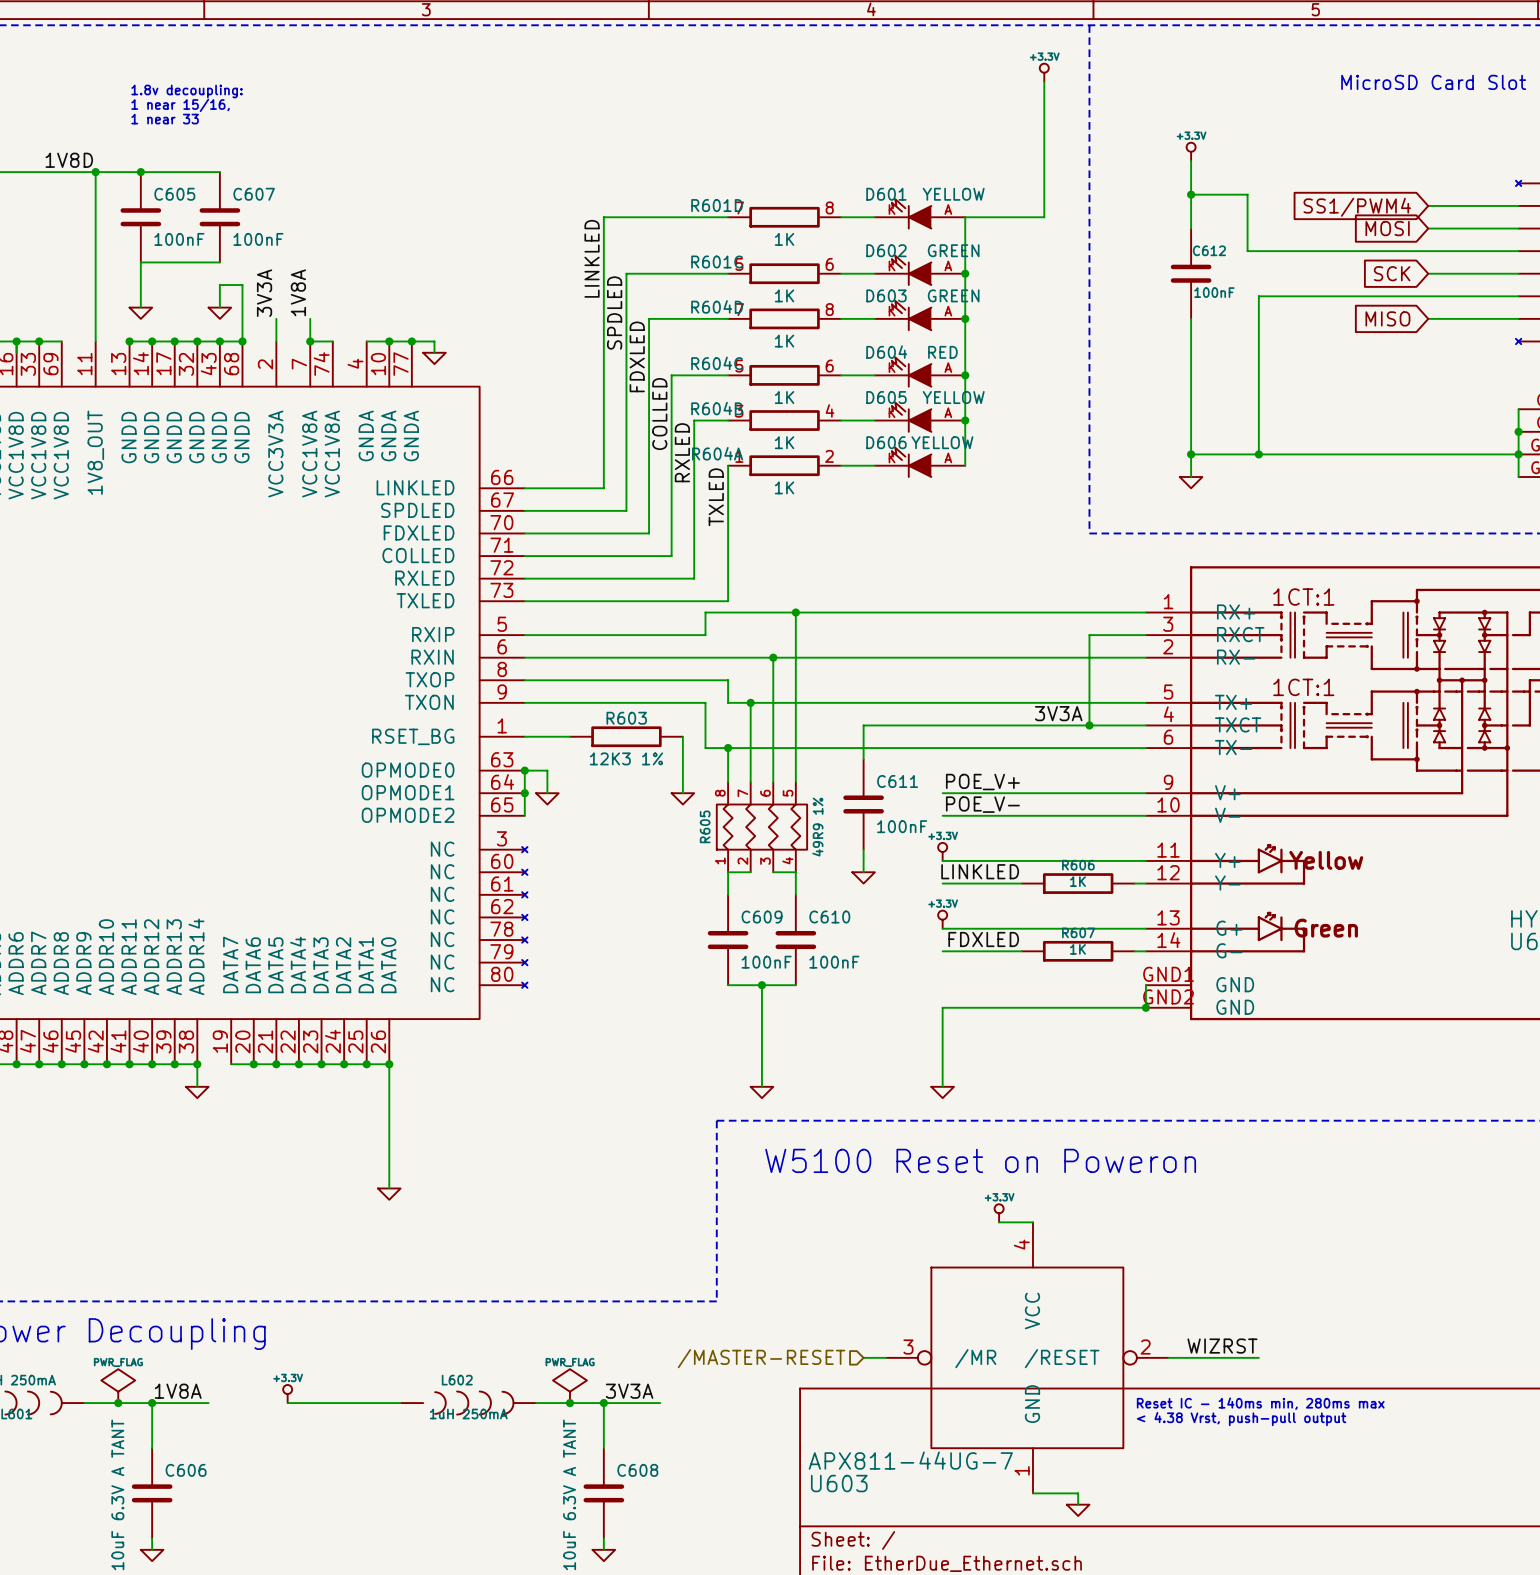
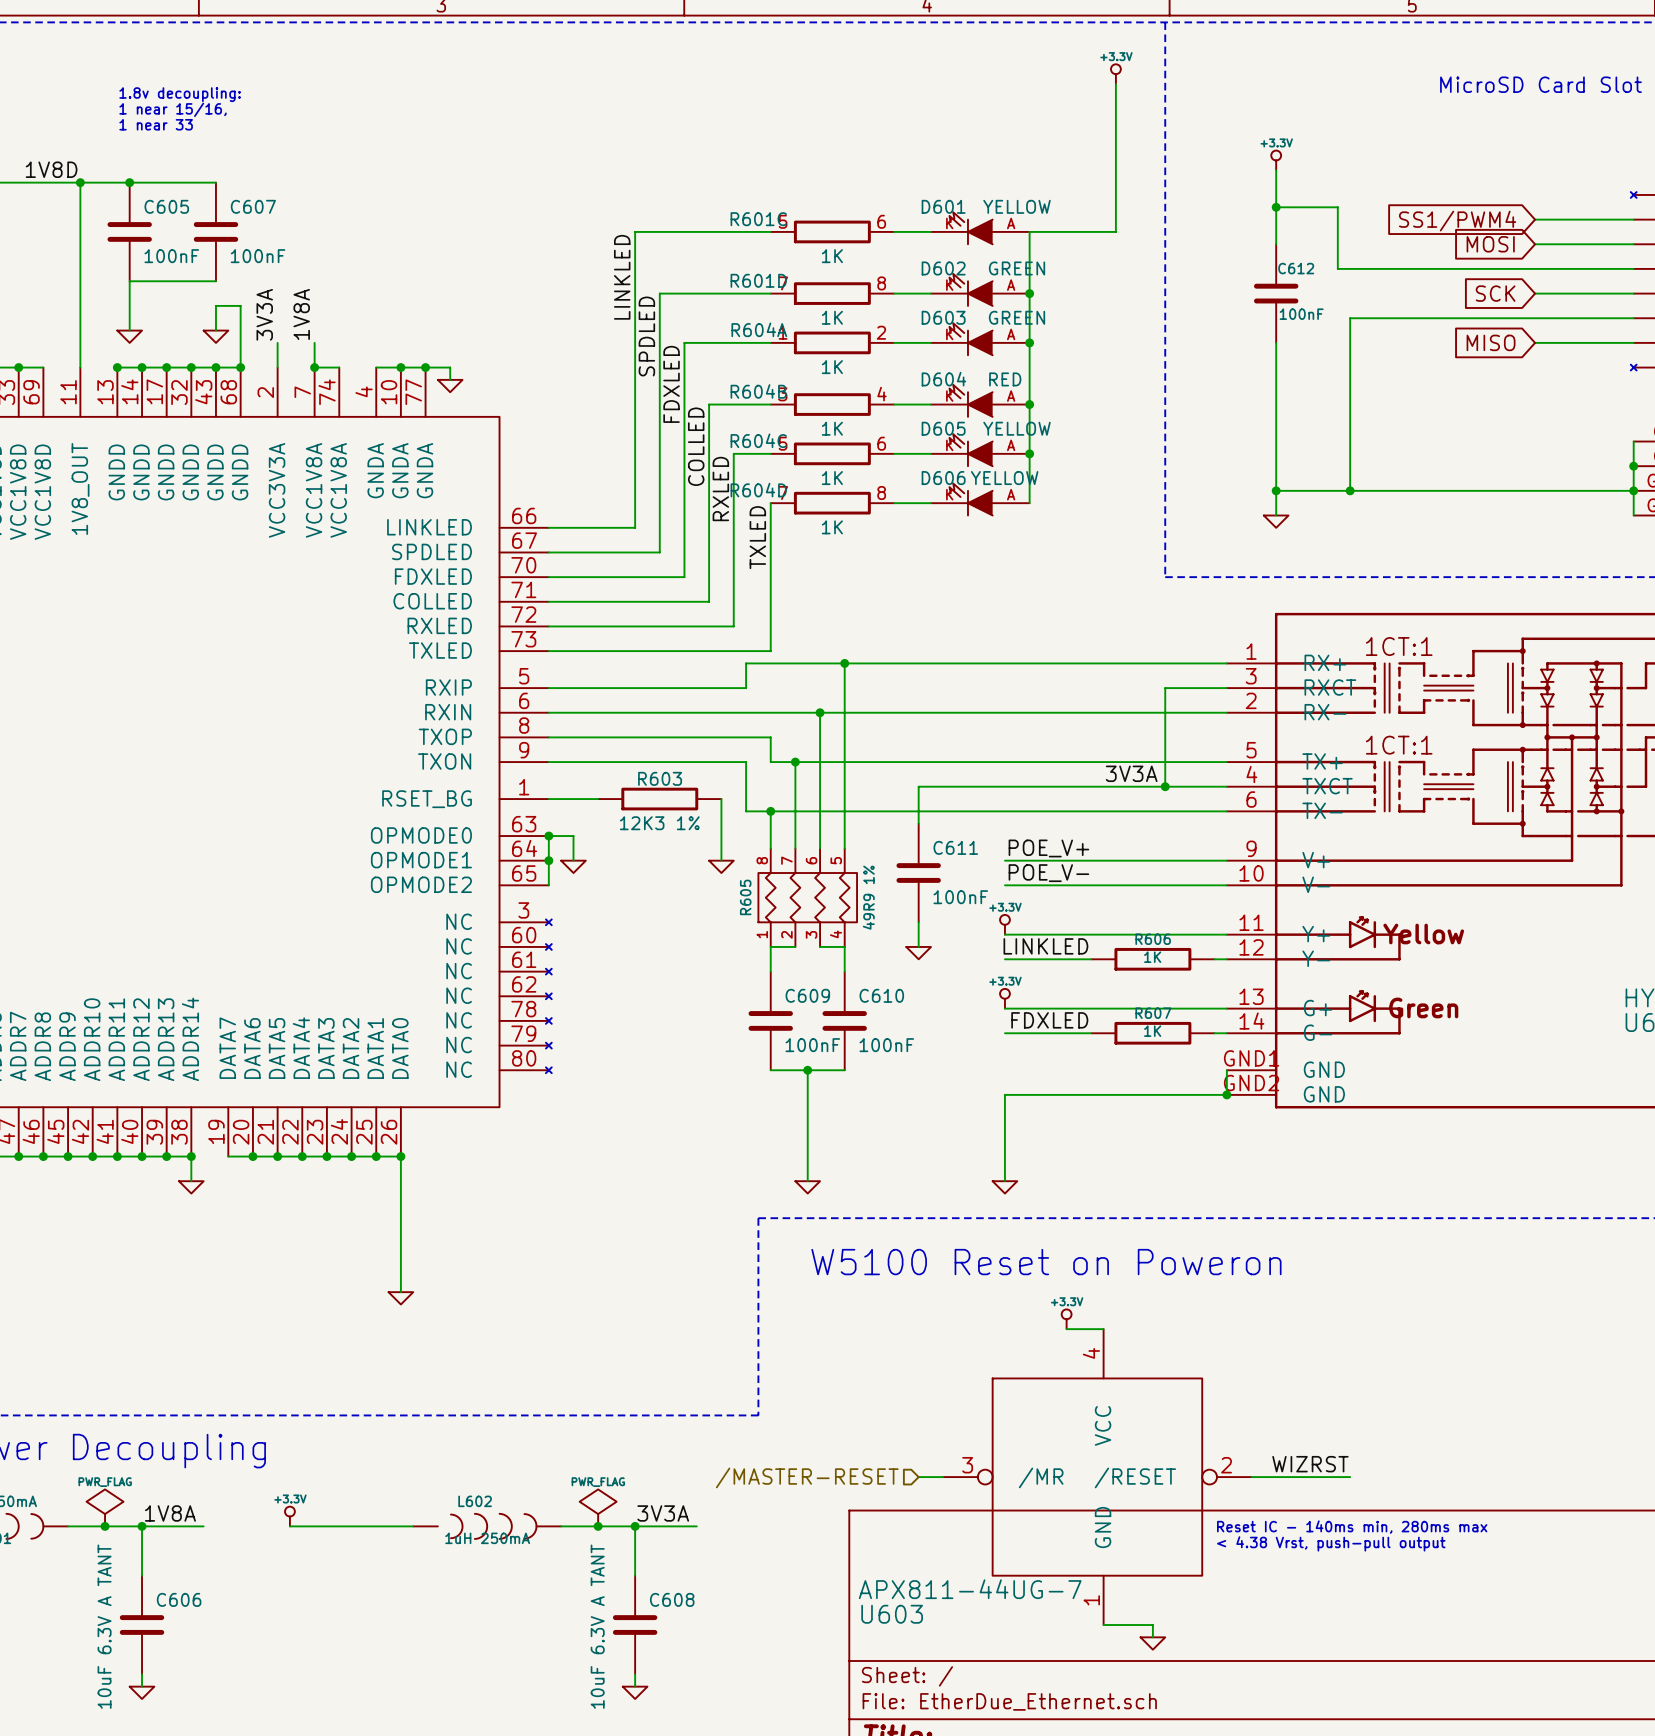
R601D position: (784, 217) -> (832, 293)
R601C position: (784, 273) -> (832, 231)
R604D position: (784, 318) -> (832, 503)
R604C position: (784, 375) -> (832, 453)
R604B position: (784, 420) -> (832, 404)
R604A position: (784, 465) -> (832, 342)

